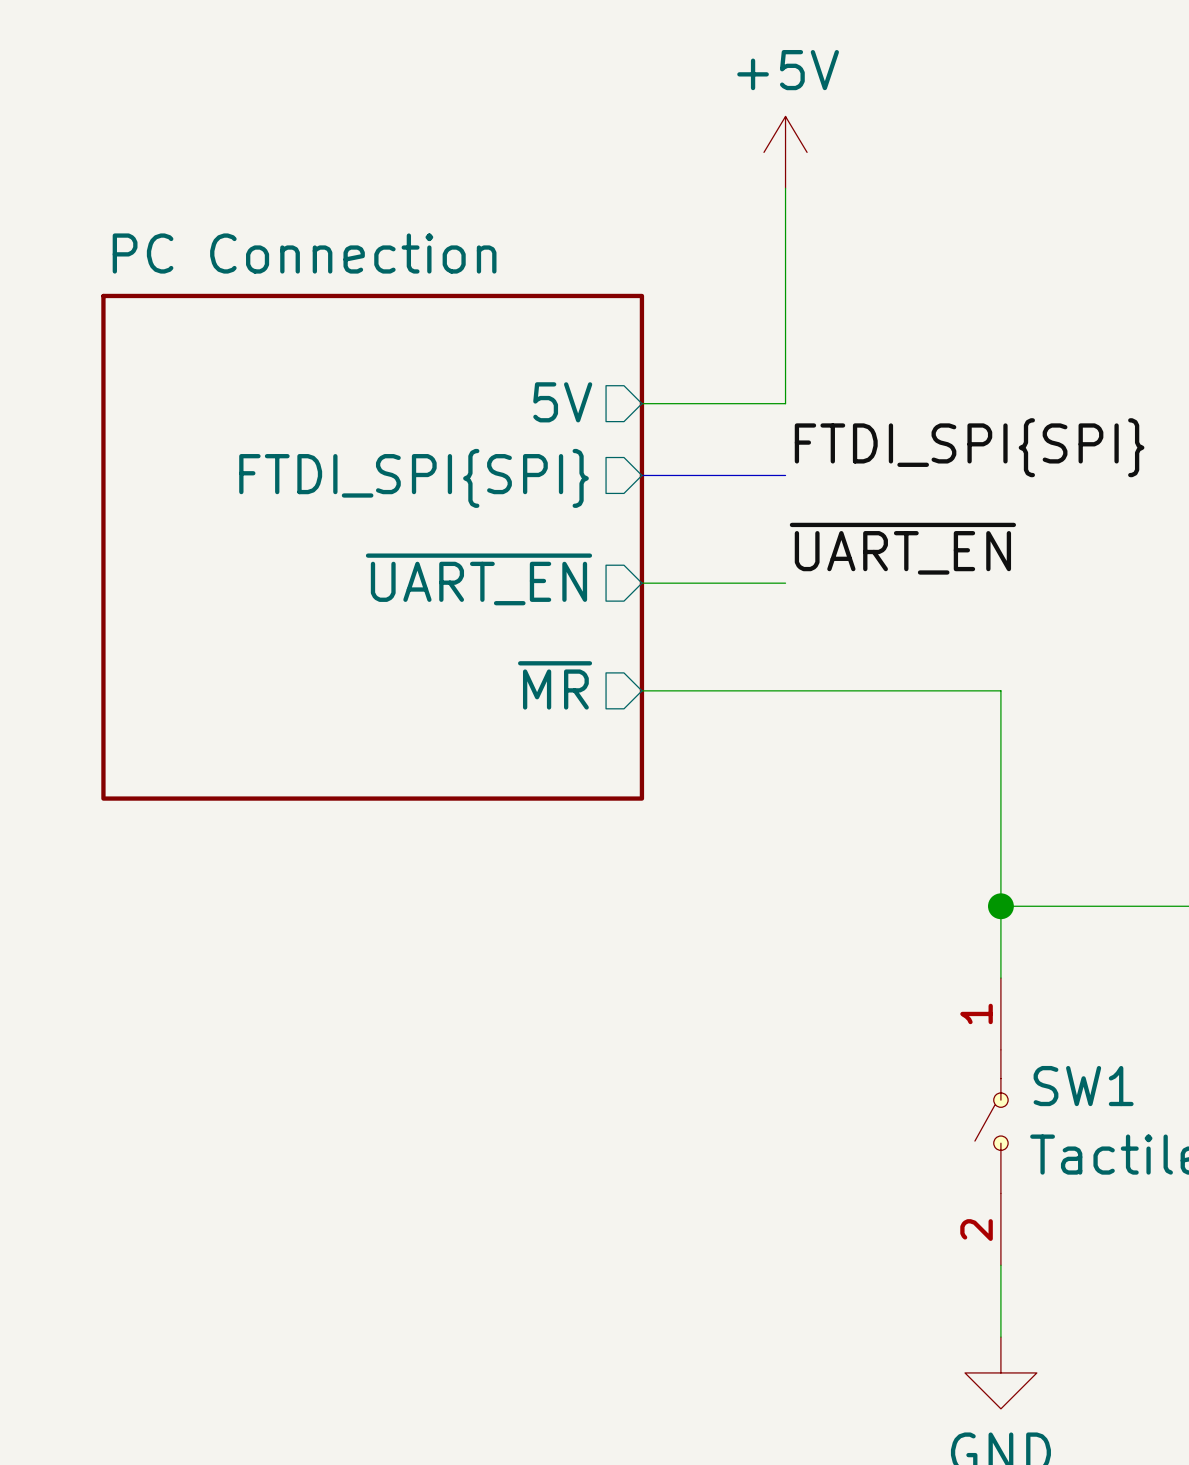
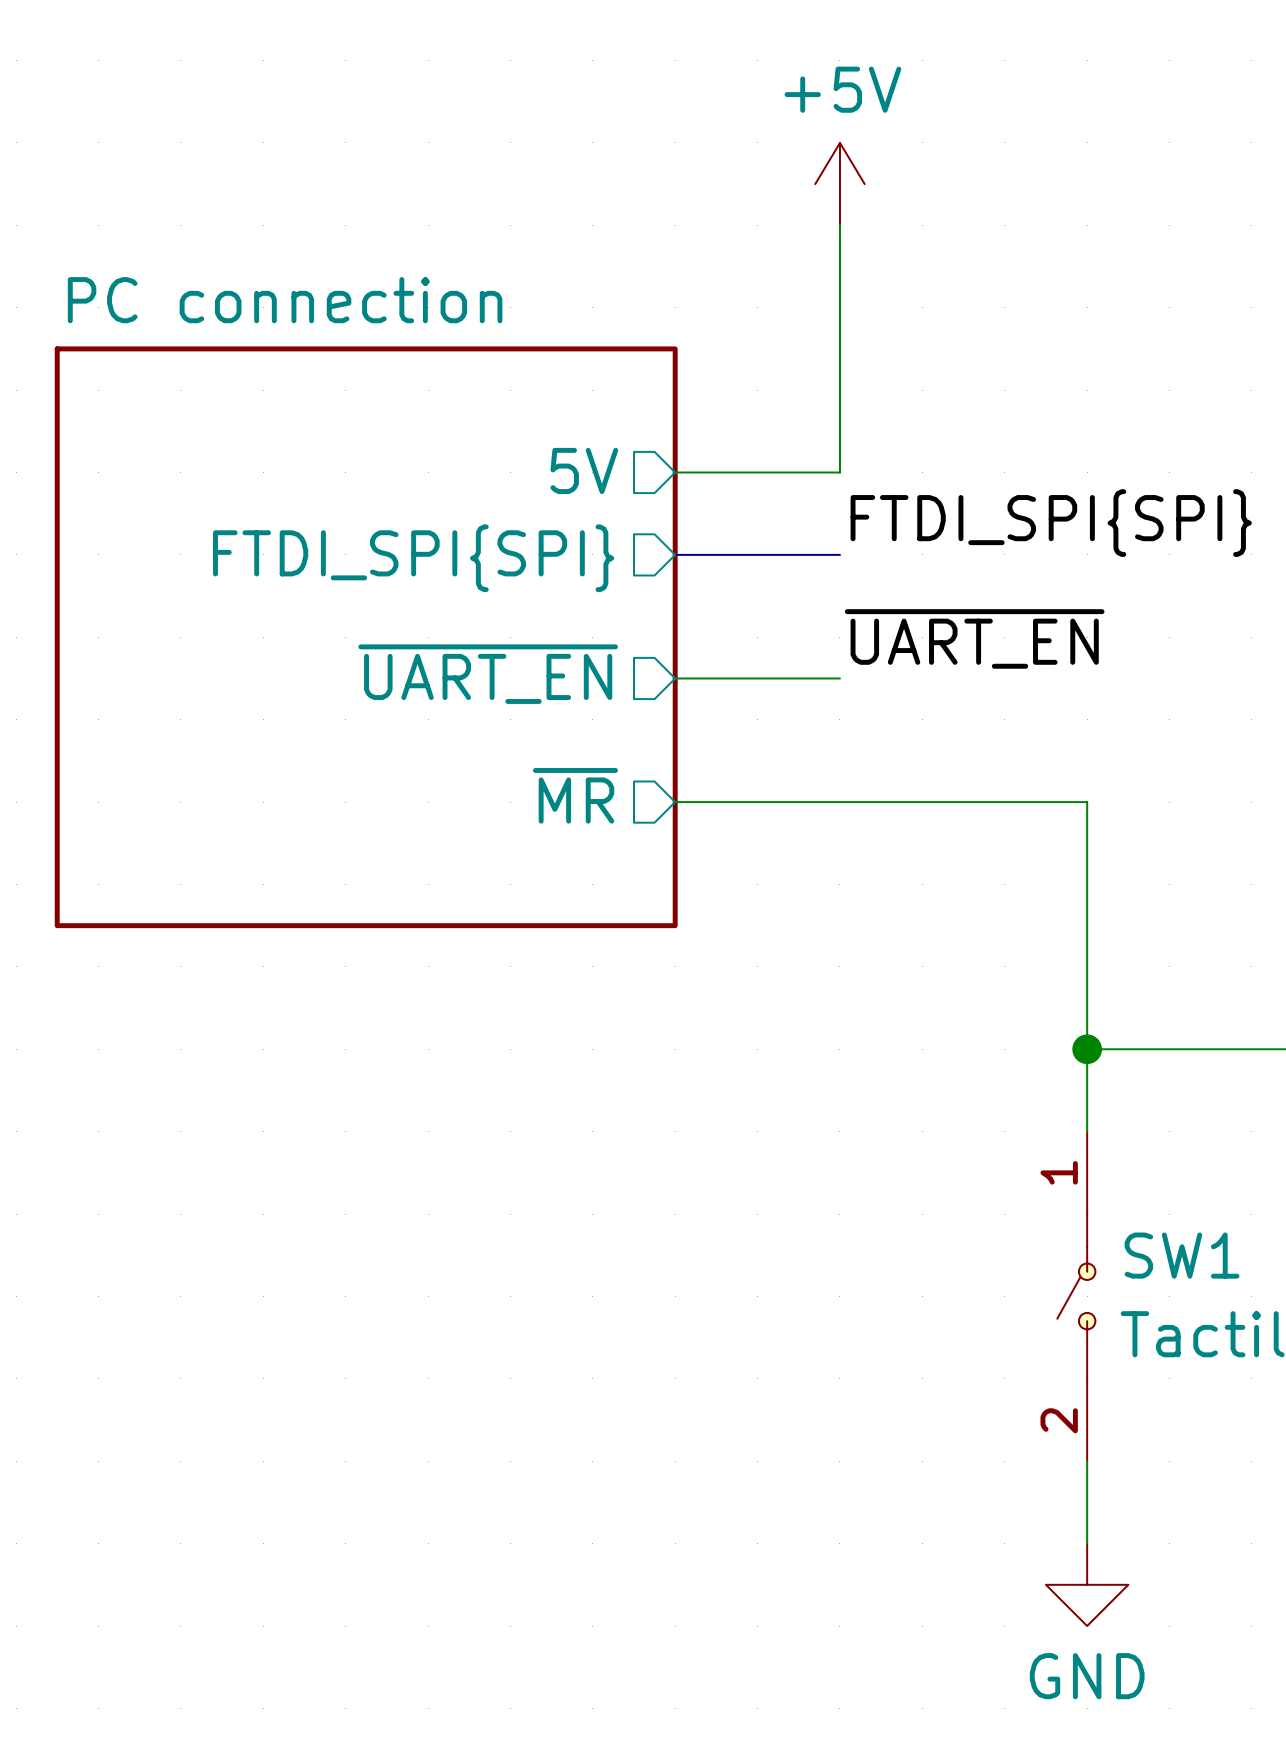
sheet PC Connection name: PC Connection (304, 253) -> PC connection (285, 300)

